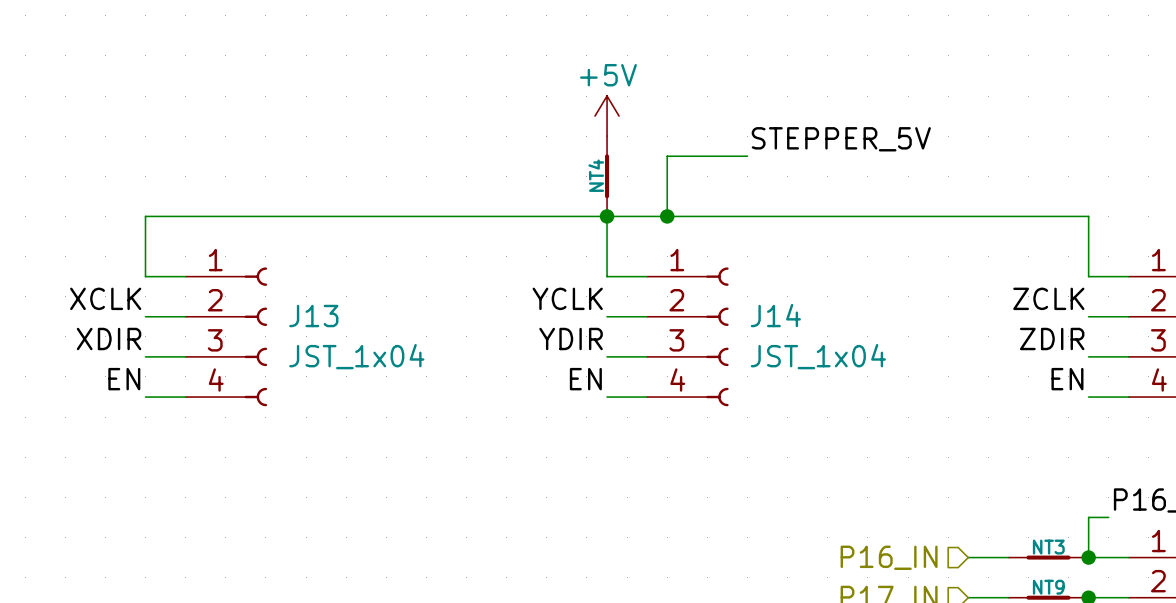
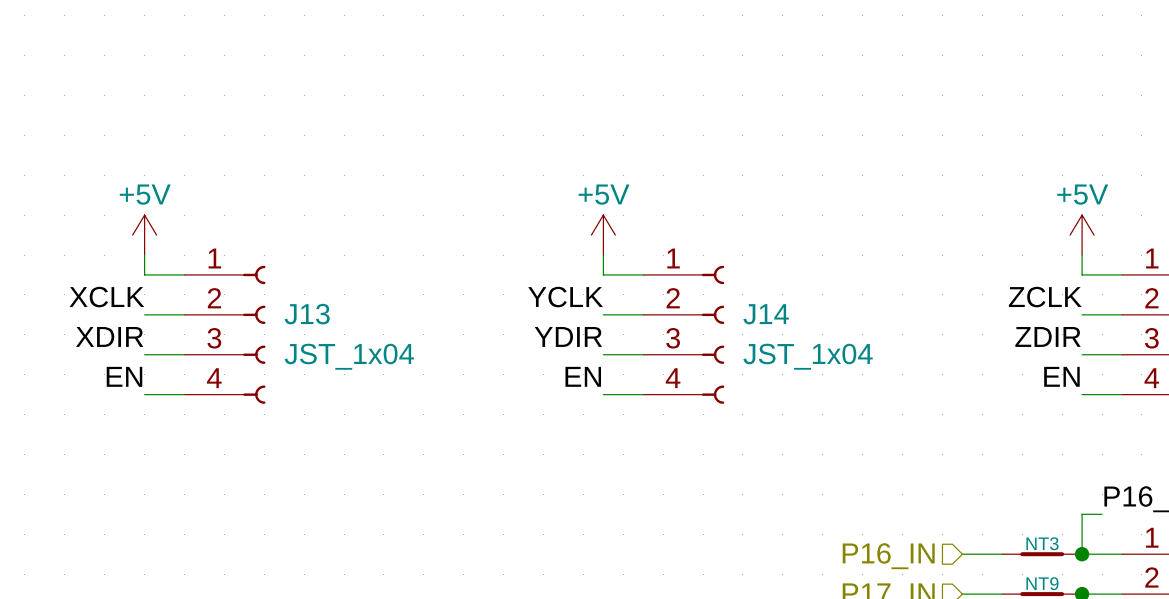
power symbol position: +5V (607, 116) -> +5V (603, 235)
label: STEPPER_5V (841, 139) -> none
wire: (747, 156) (667, 156) (667, 216) -> none
NT4: (607, 176) -> none
junction: (607, 216) -> none
junction: (667, 216) -> none
power symbol: none -> +5V (144, 235)
power symbol: none -> +5V (1082, 235)
wire: (145, 256) (145, 216) (1088, 216) (1088, 256) -> none

